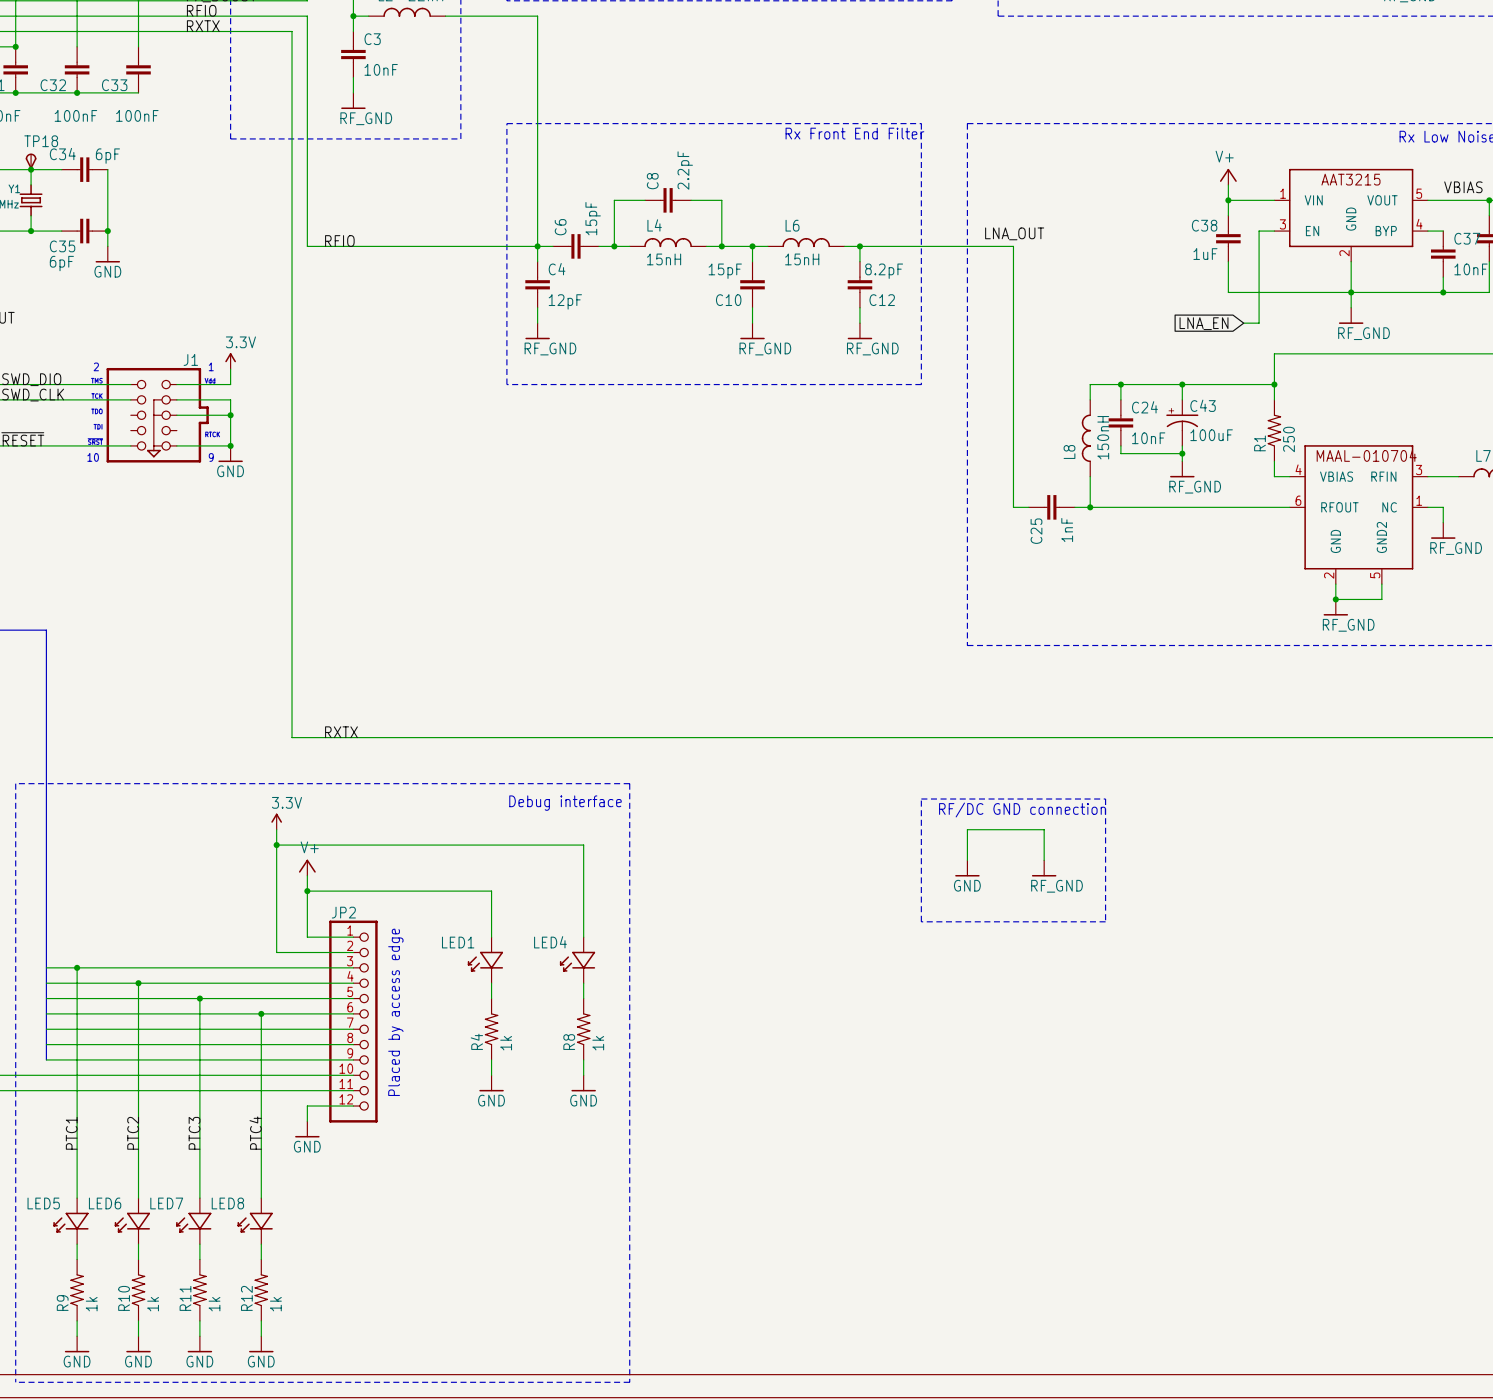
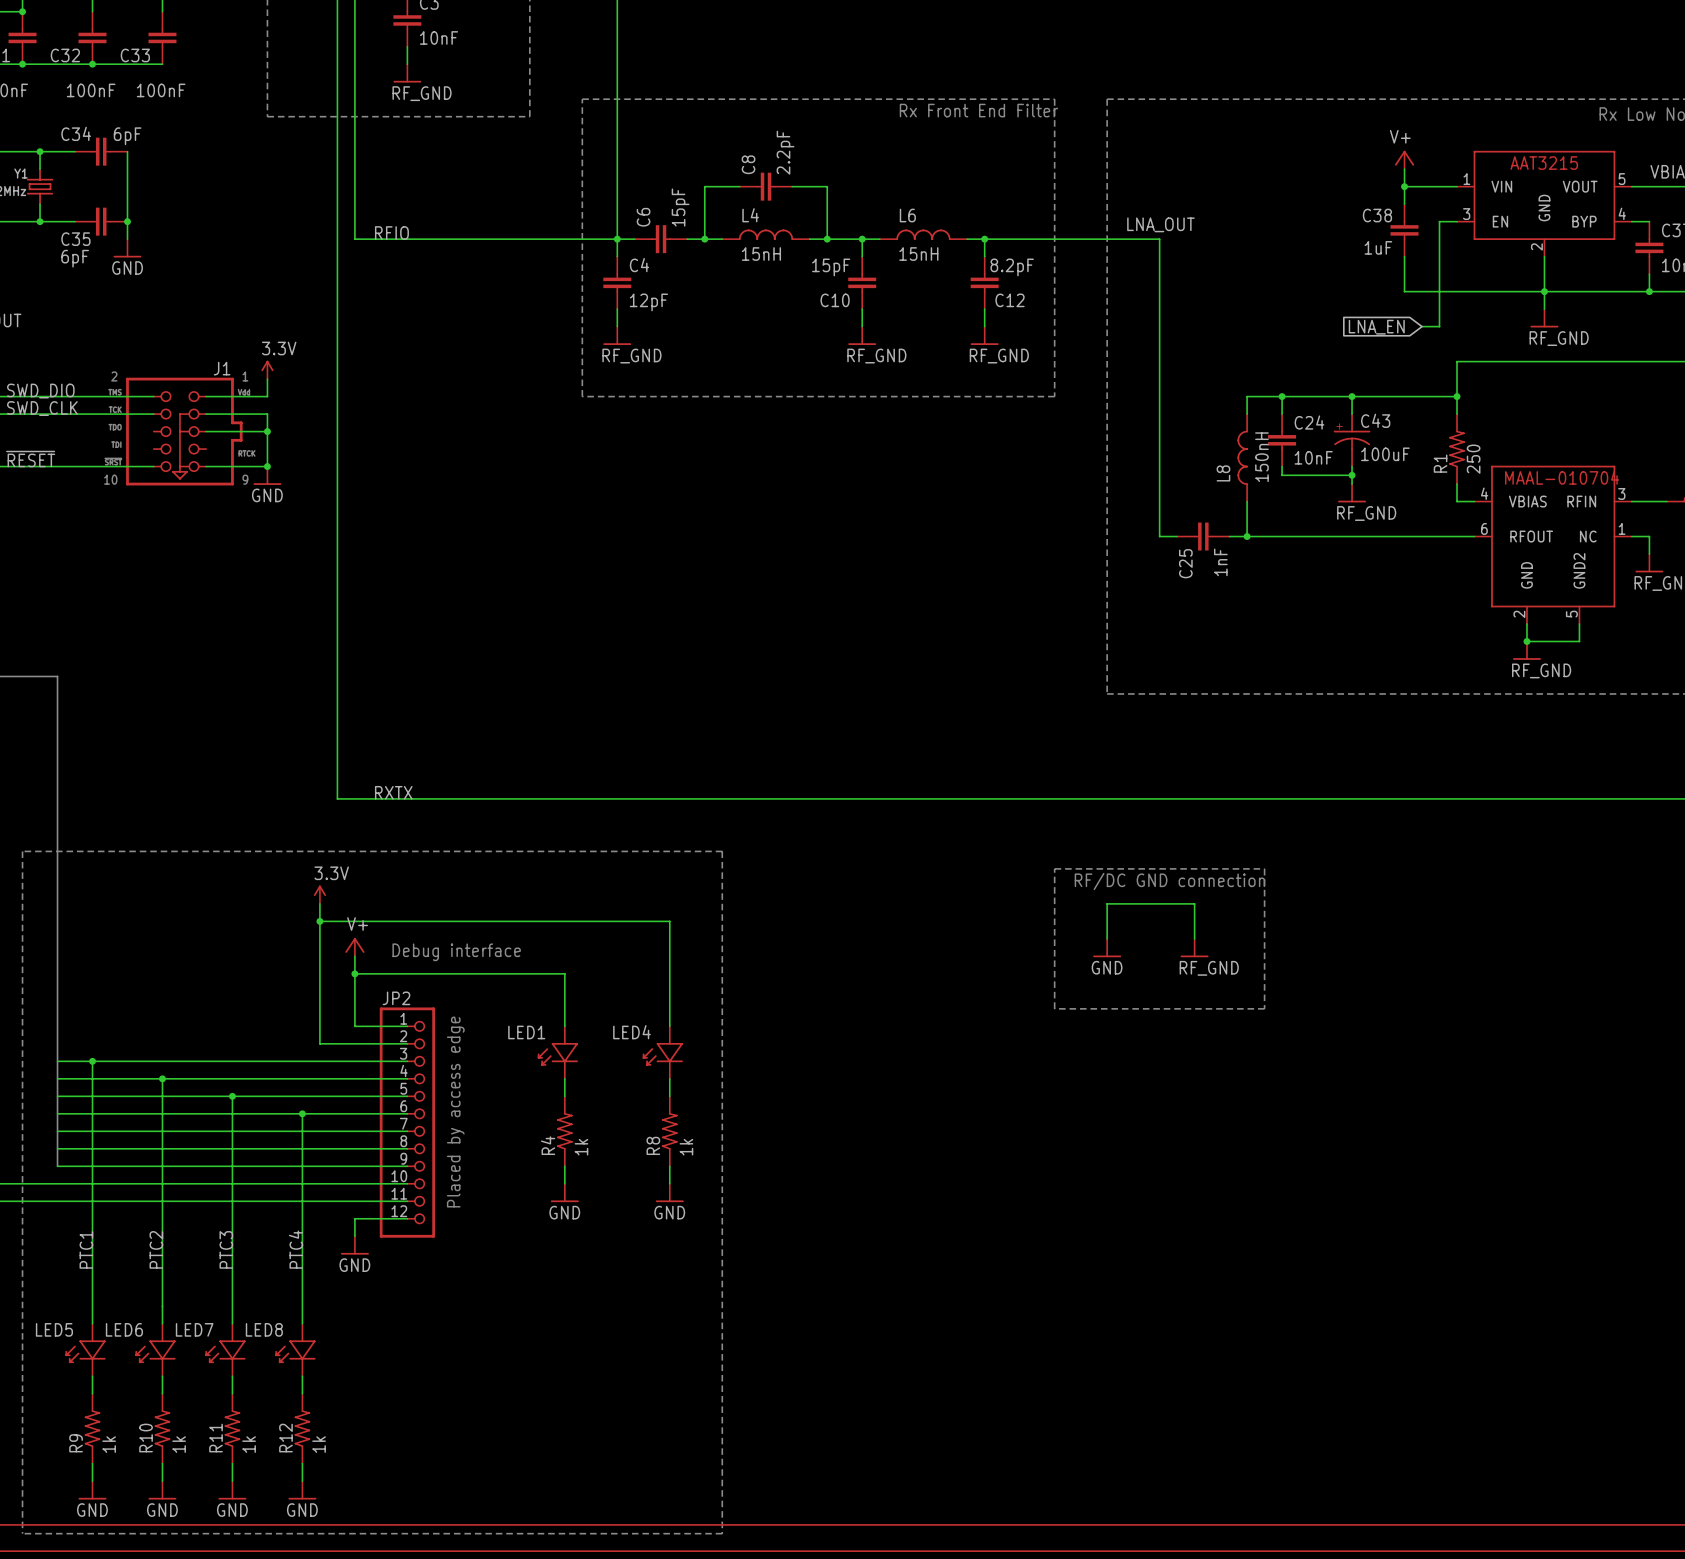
TP18: (31, 161) -> none
text: Debug interface (565, 803) -> none
text: none -> Debug interface (456, 952)

